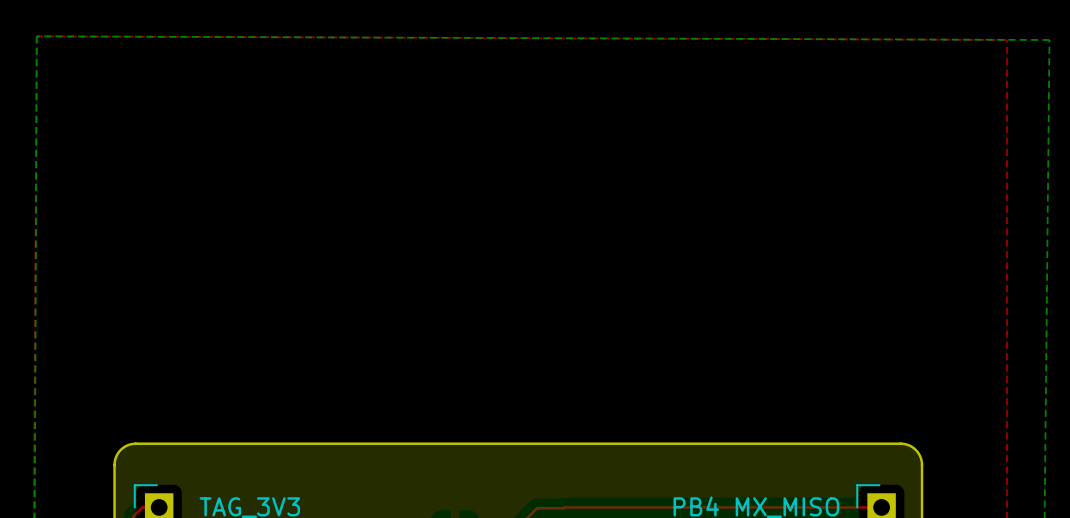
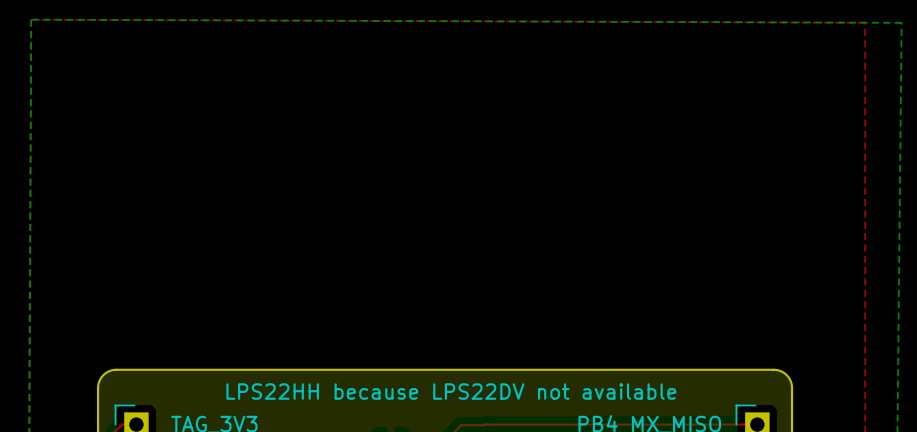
text: none -> LPS22HH because LPS22DV not available (451, 391)

